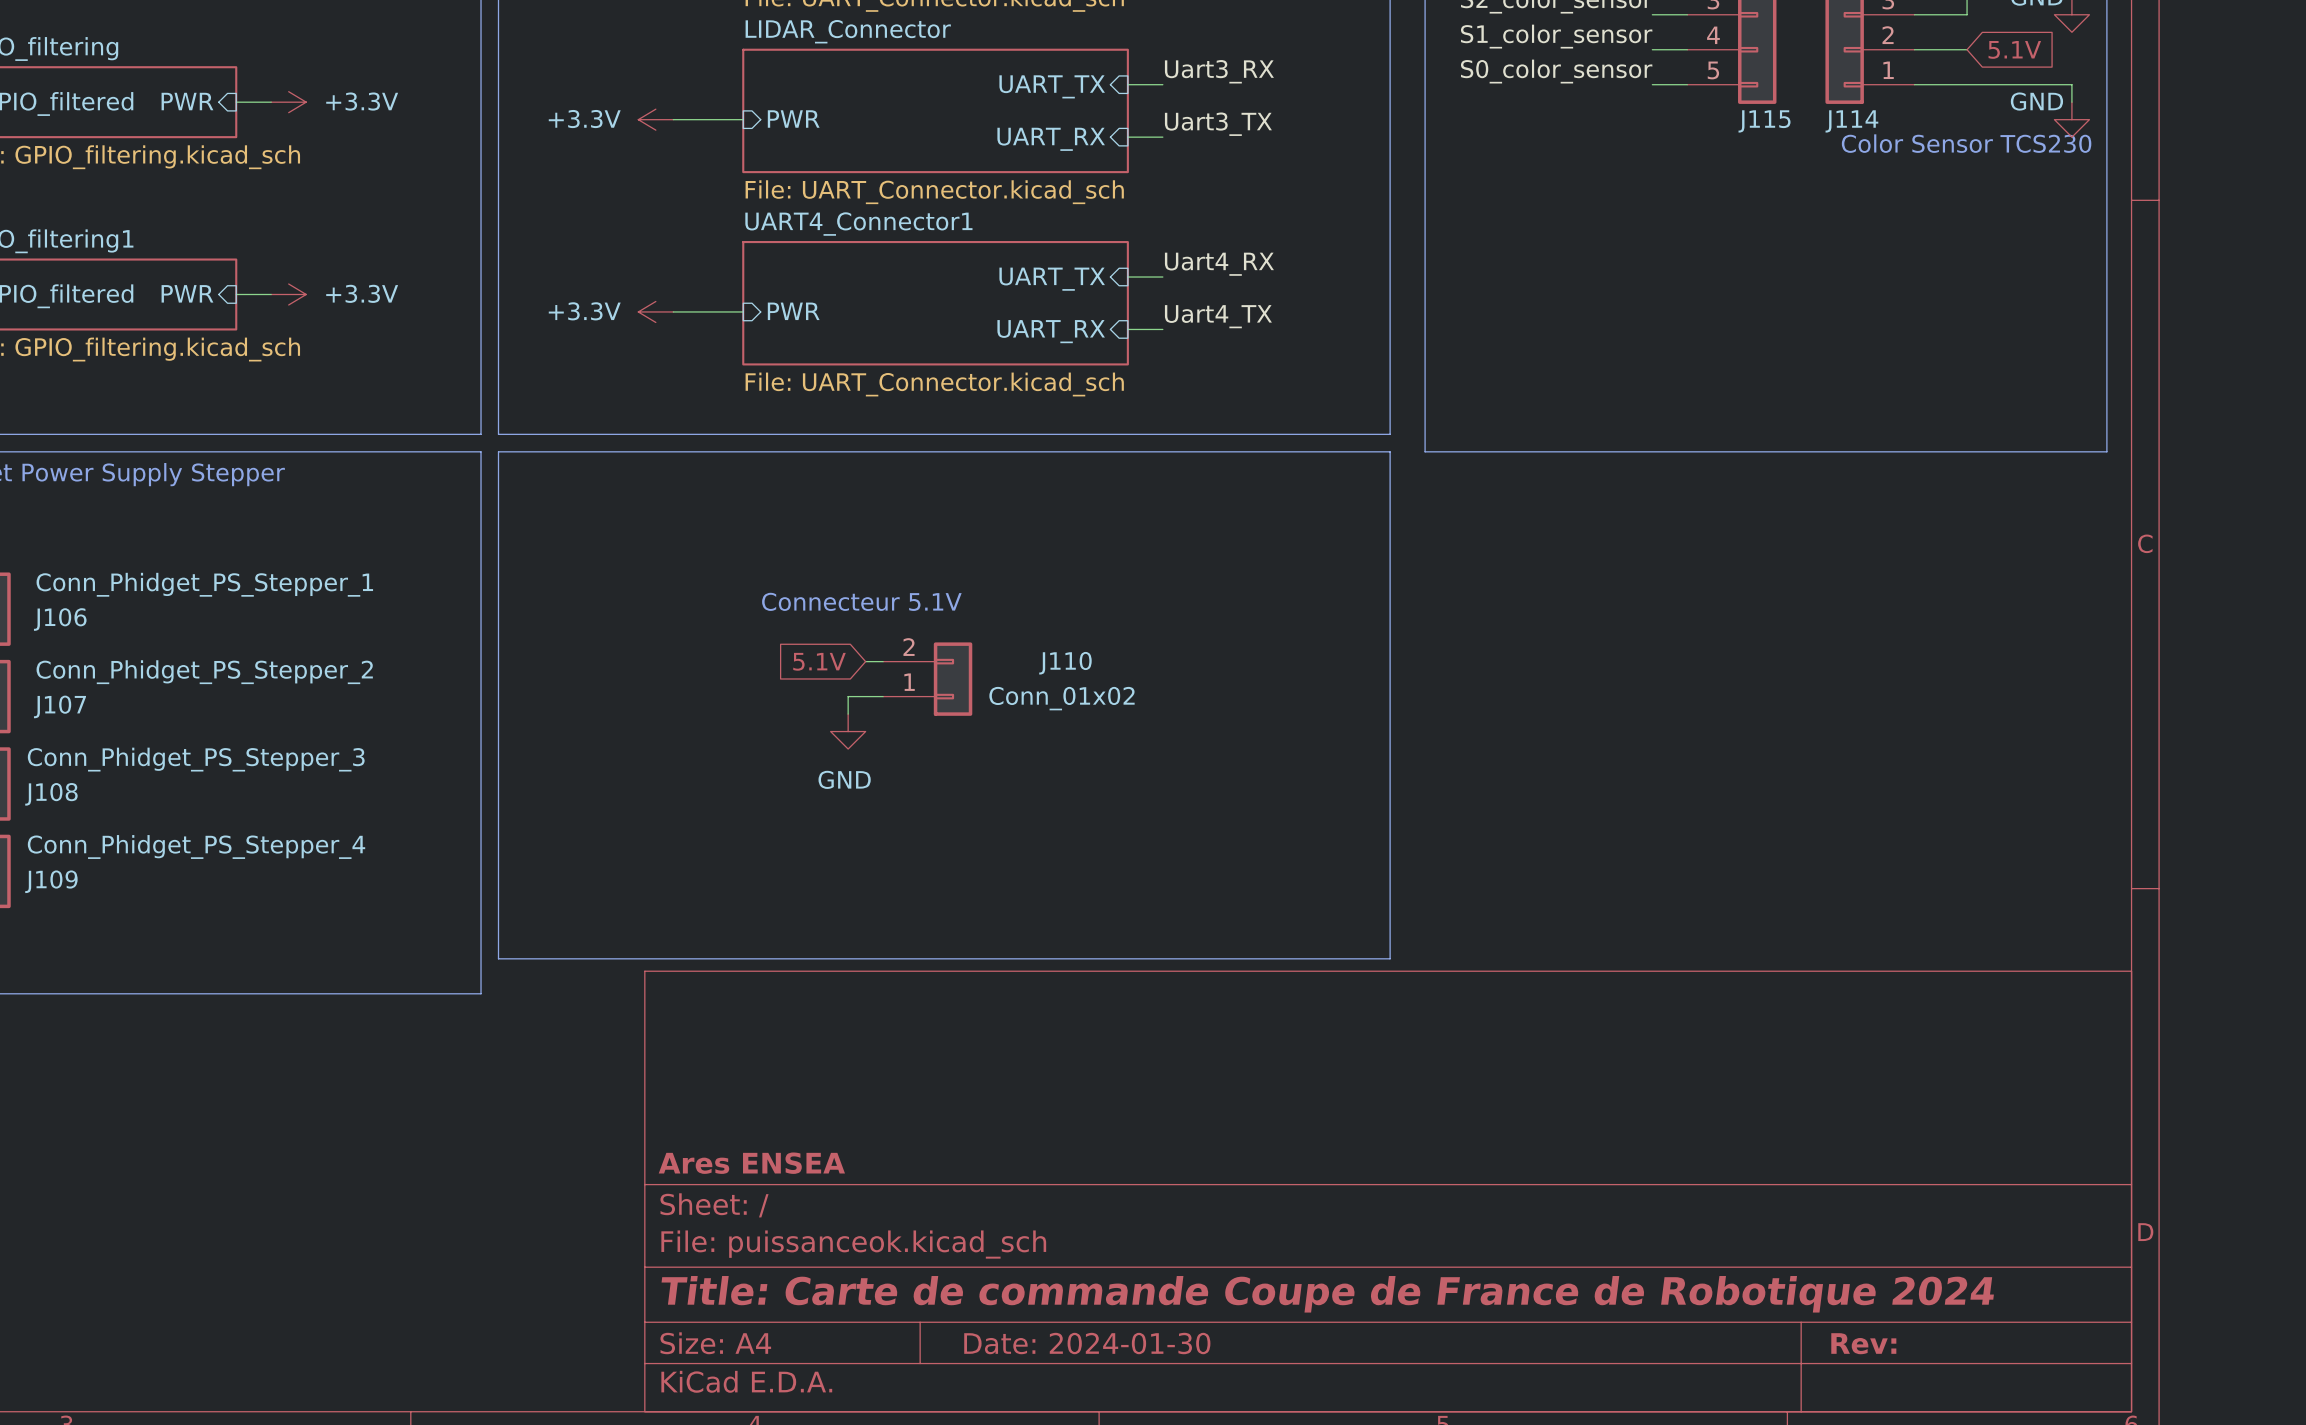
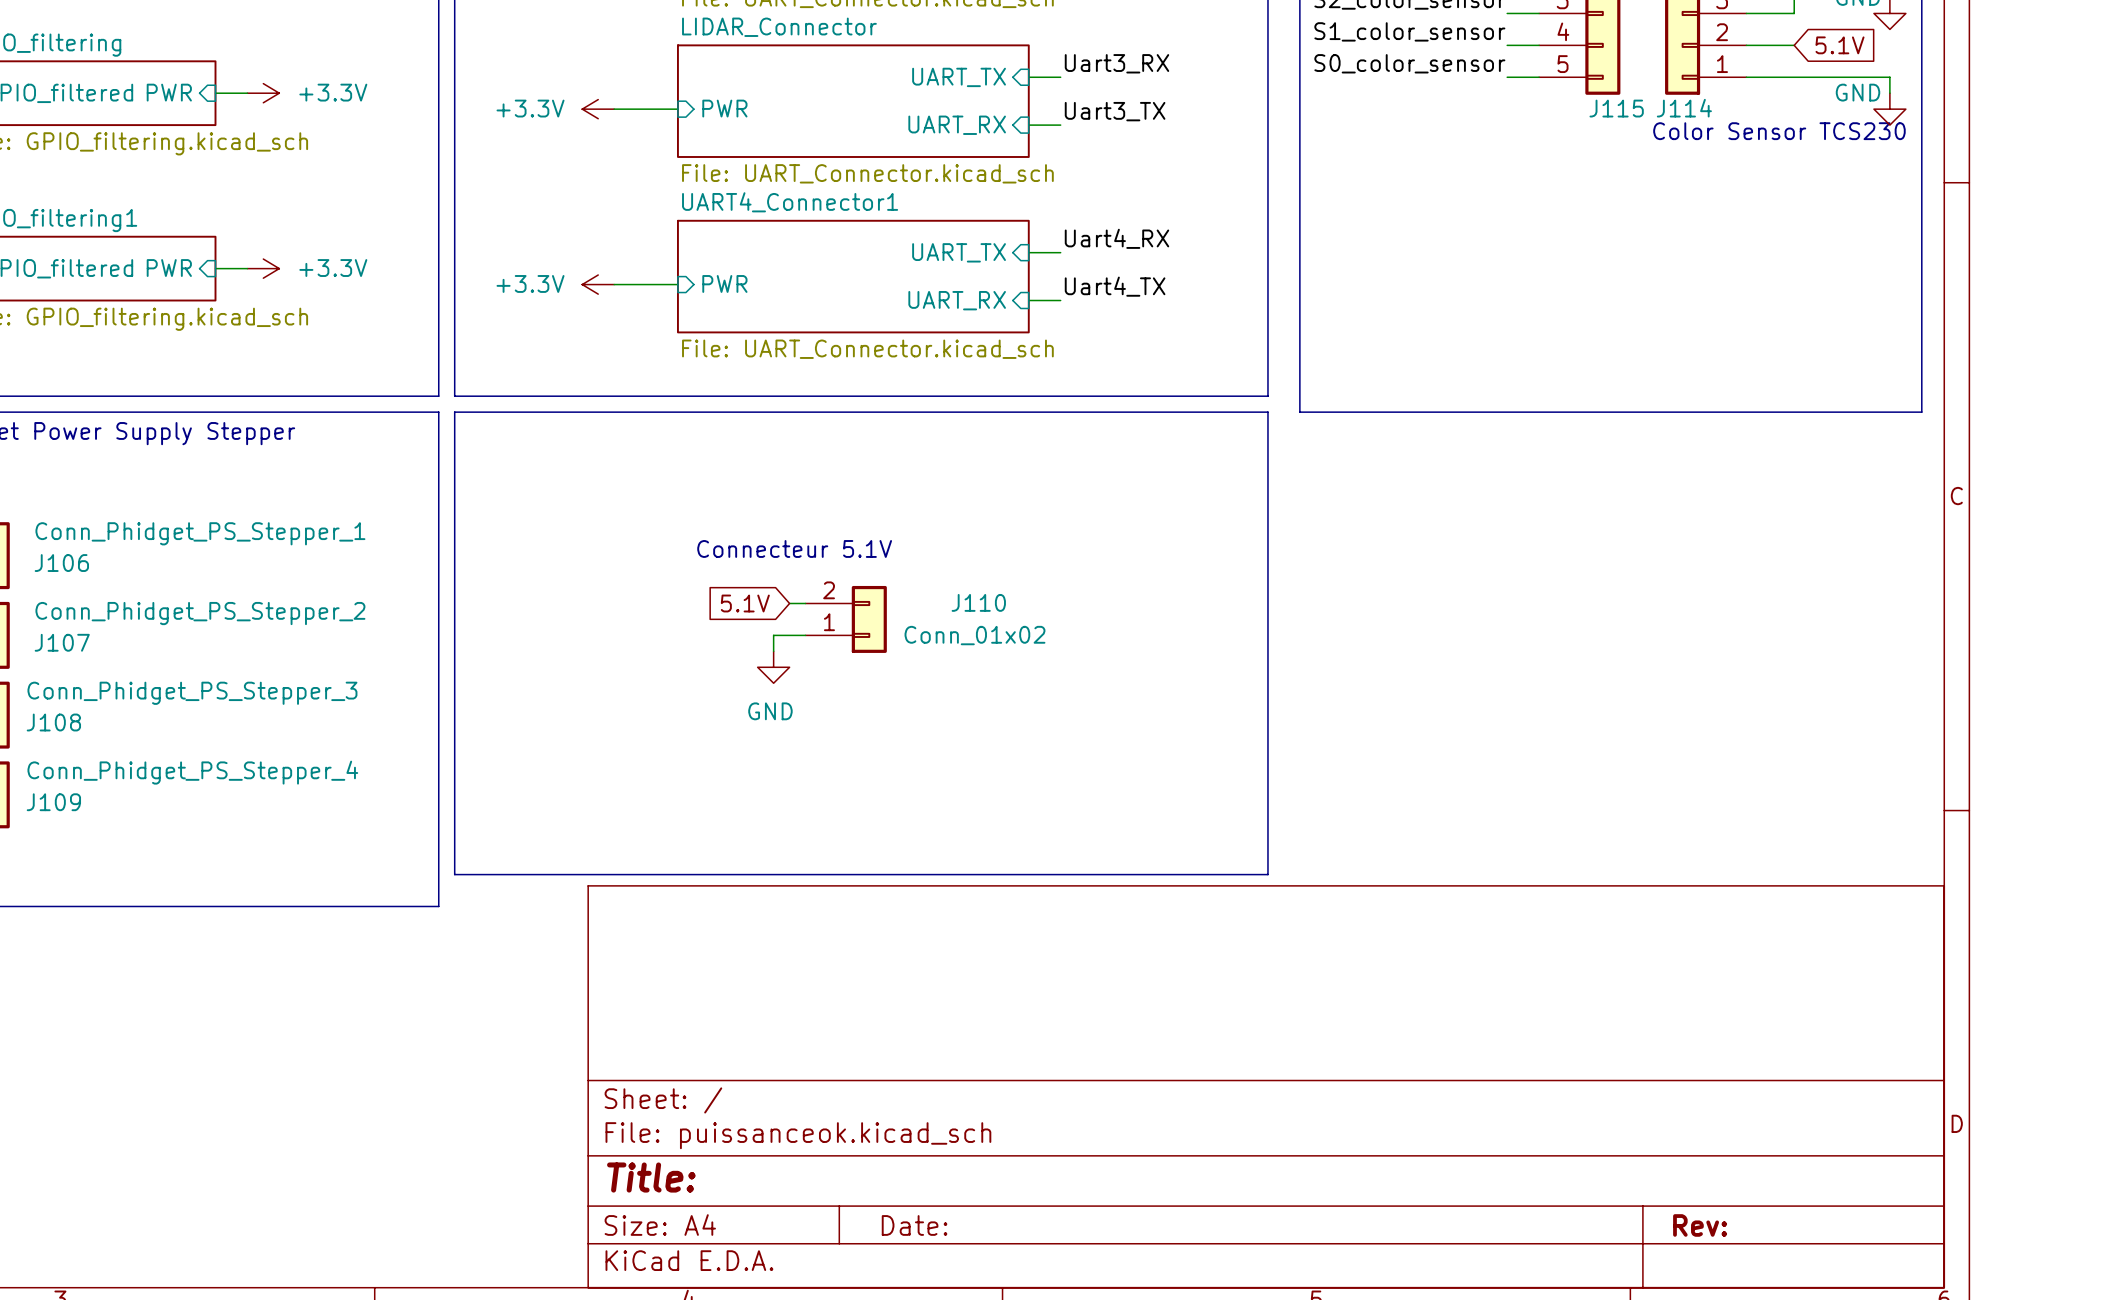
title block: Ares ENSEA (751, 1163) -> none
title block: Title: Carte de commande Coupe de France de Robotique 2024 (1327, 1294) -> Title: (651, 1177)
title block: Date: 2024-01-30 (1087, 1343) -> Date: (914, 1225)

